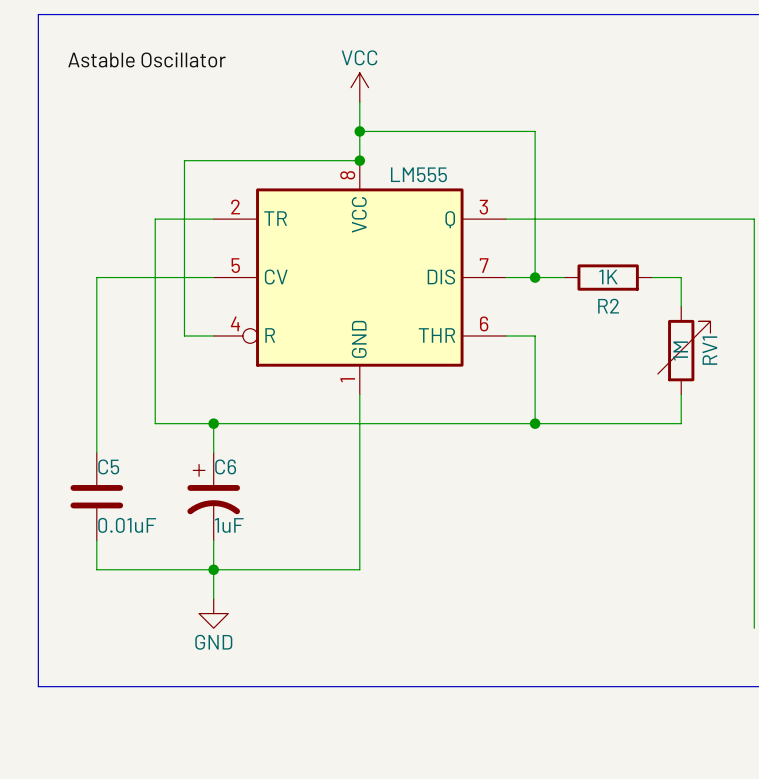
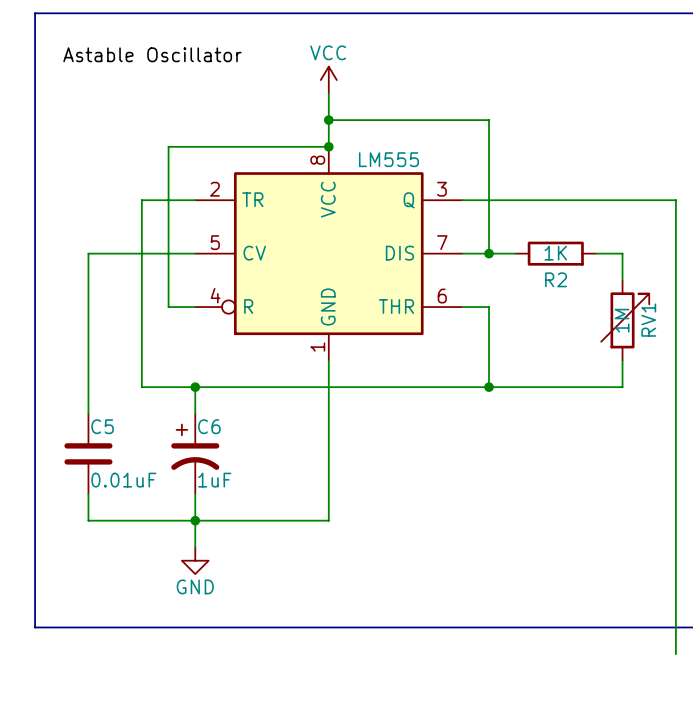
wire: (739, 219) (754, 219) (754, 628) -> (675, 200) (675, 654)

